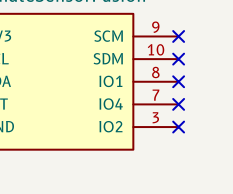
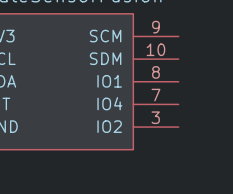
no-connect mark: (178, 36) -> none
no-connect mark: (178, 59) -> none
no-connect mark: (178, 81) -> none
no-connect mark: (178, 104) -> none
no-connect mark: (178, 127) -> none

